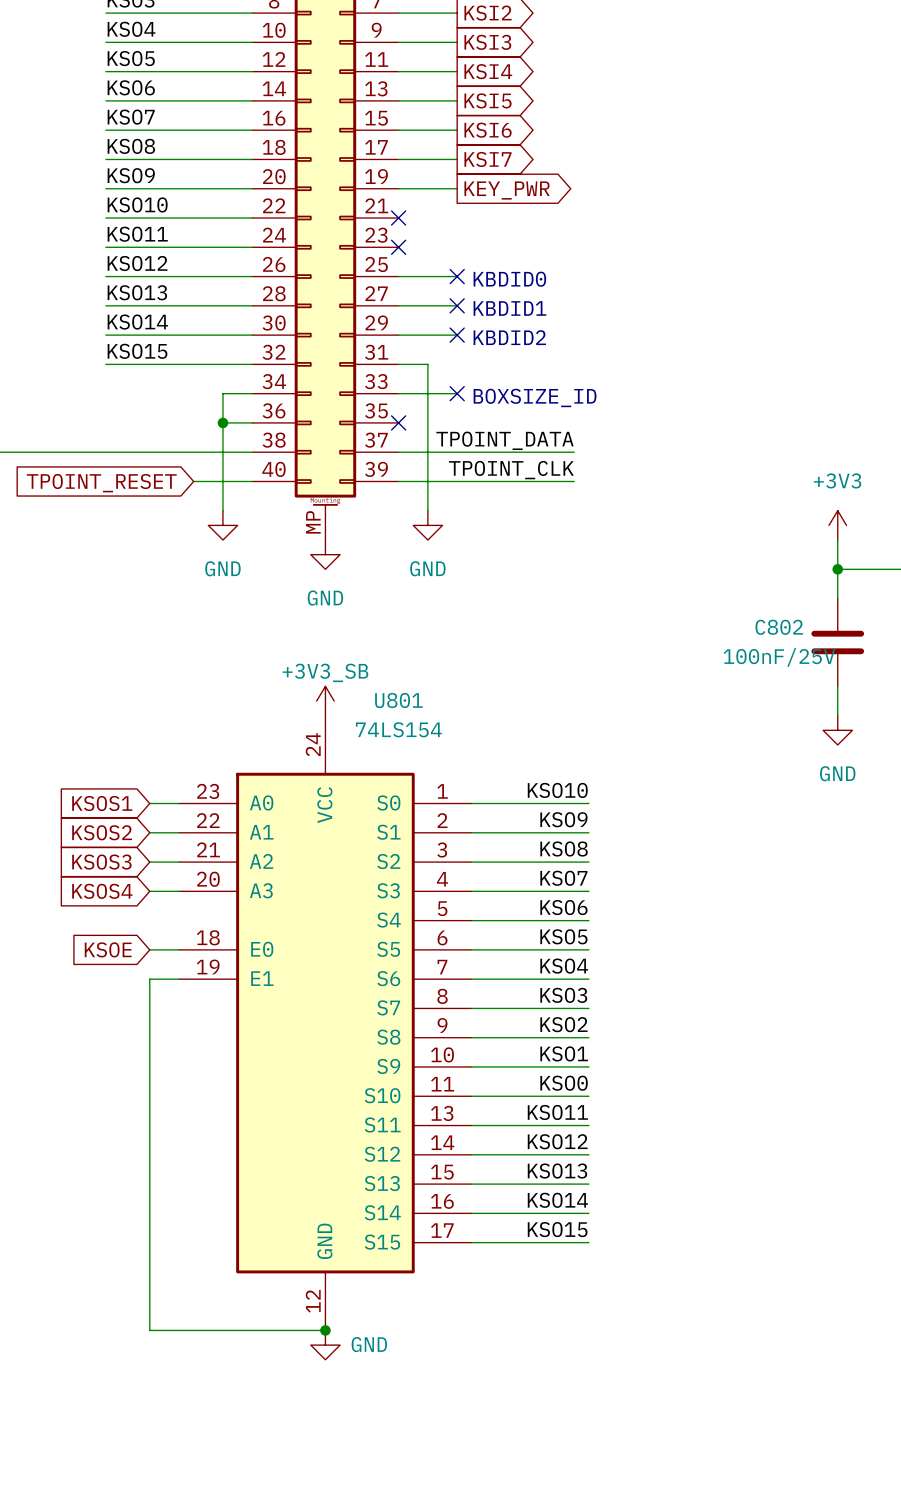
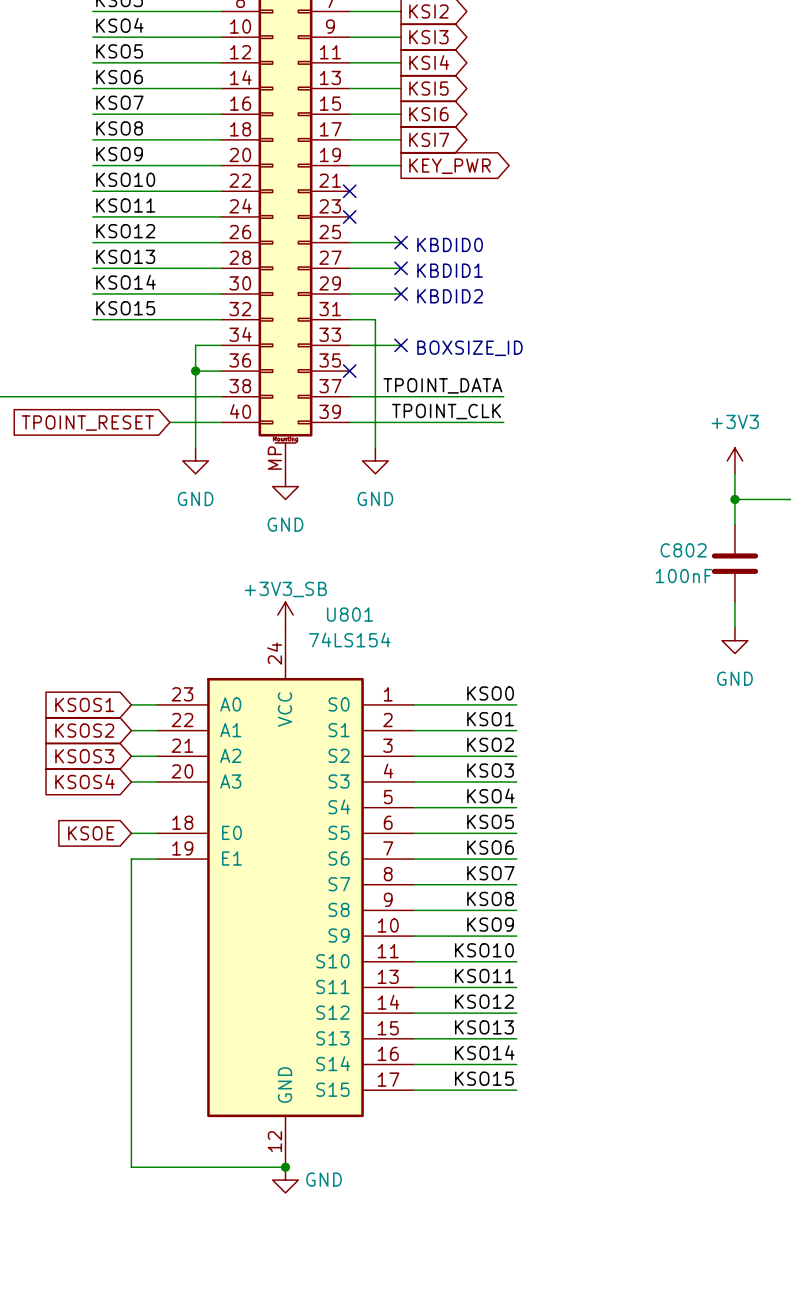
C802 value: 100nF/25V (779, 657) -> 100nF (683, 576)
label: KSO10 (557, 790) -> KSO0 (490, 693)
label: KSO9 (563, 819) -> KSO1 (490, 719)
label: KSO8 (564, 849) -> KSO2 (490, 744)
label: KSO7 (563, 878) -> KSO3 (490, 770)
label: KSO6 (563, 907) -> KSO4 (490, 795)
label: KSO4 (564, 966) -> KSO6 (490, 847)
label: KSO3 (563, 995) -> KSO7 (490, 873)
label: KSO2 (563, 1024) -> KSO8 (490, 898)
label: KSO1 (564, 1053) -> KSO9 (490, 924)
label: KSO0 (564, 1083) -> KSO10 (484, 950)

